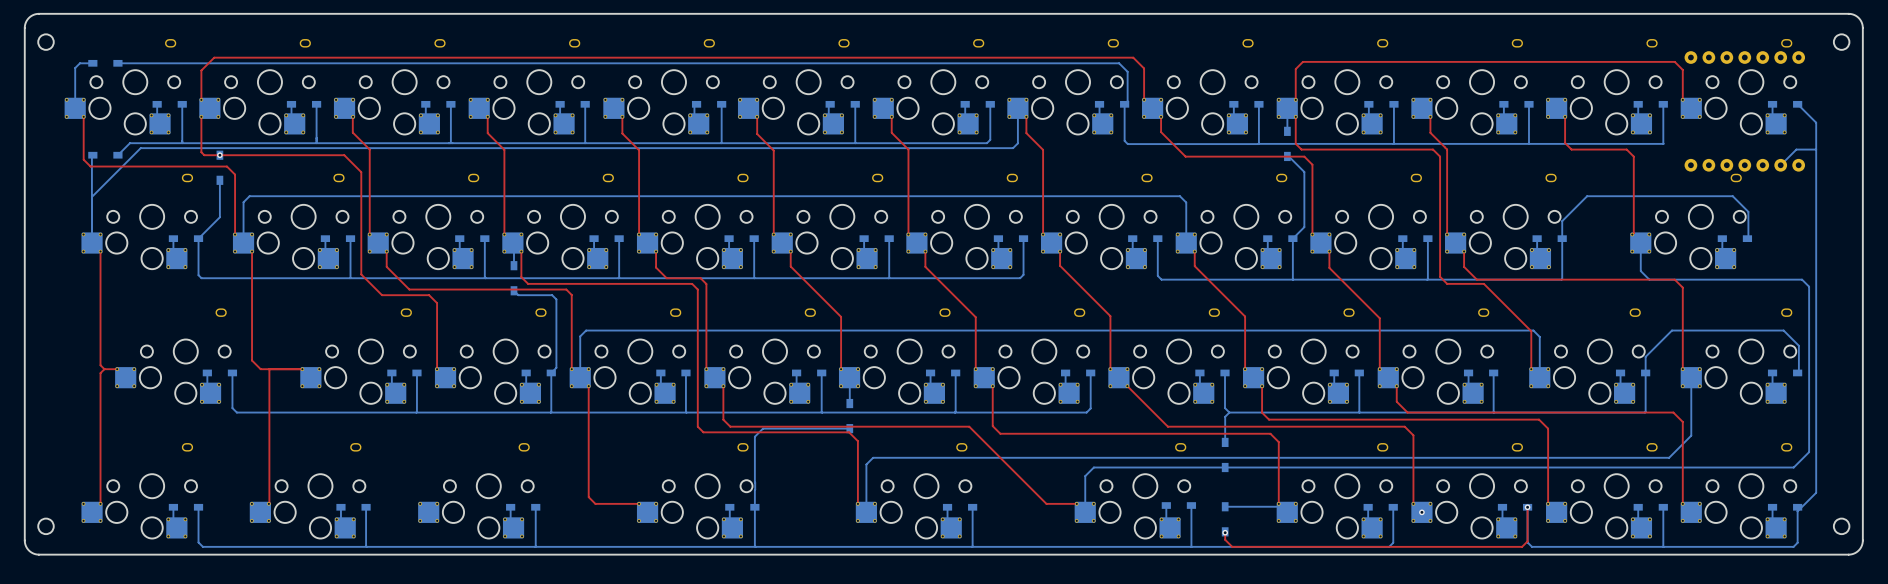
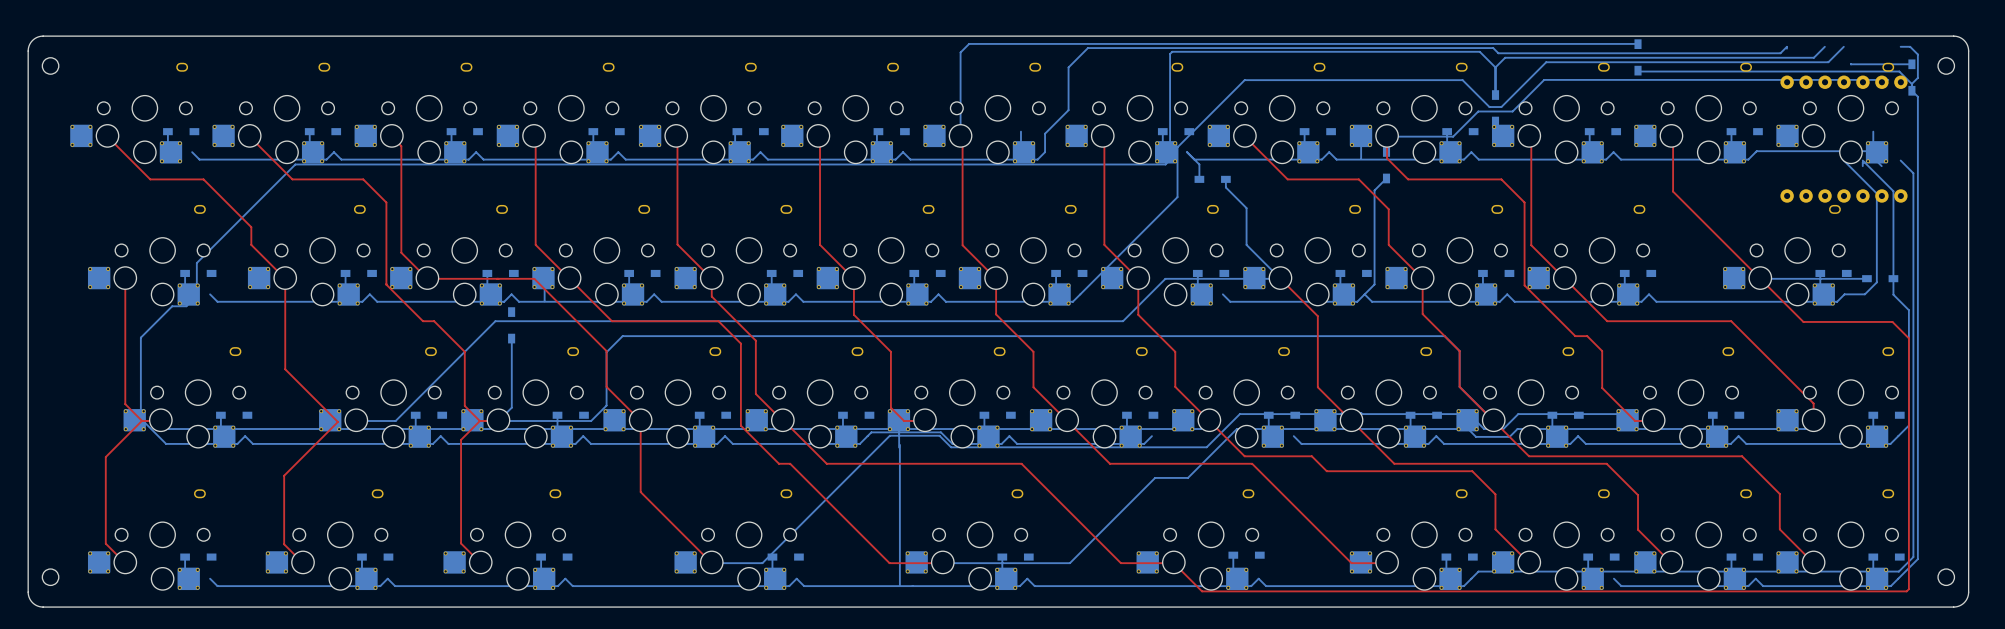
bottom track: none -> (1638, 44) (969, 43) (960, 52) (960, 136)
bottom track: none -> (1824, 46) (1813, 57) (1505, 57) (1495, 67) (1495, 95)
bottom track: none -> (1843, 46) (1828, 62) (1546, 62) (1501, 107) (1489, 107) (1462, 80) (1244, 80) (1177, 147) (1177, 197) (1072, 301) (945, 301) (938, 294) (931, 301) (803, 301) (795, 294) (788, 301) (661, 301) (654, 294) (646, 301) (519, 301) (511, 294) (504, 301) (377, 301) (369, 294) (362, 301) (217, 301) (210, 294)
bottom track: none -> (1900, 46) (1910, 46) (1917, 54) (1917, 77) (1911, 83) (1911, 90) (1917, 96) (1917, 559) (1890, 586) (1763, 586) (1755, 578) (1748, 586) (1621, 586) (1613, 578)
bottom track: none -> (1786, 48) (1786, 46) (1780, 53) (1498, 53) (1493, 48) (1087, 48) (1068, 67) (1068, 110) (1045, 133) (1045, 152) (1037, 159) (910, 159) (903, 152) (895, 159) (767, 159) (760, 152) (753, 159) (625, 159) (618, 152) (610, 159) (483, 159) (476, 152) (468, 159) (341, 159) (333, 152) (326, 159) (199, 159) (192, 152)
part: none -> (1638, 57)
bottom track: none -> (1850, 64) (1911, 64)
bottom track: none -> (1495, 67) (1479, 51) (1172, 51) (1170, 54) (1170, 160) (1165, 164) (295, 164) (196, 263) (196, 295) (186, 306) (172, 306) (140, 337) (140, 418) (166, 443) (237, 443) (245, 436) (252, 443) (432, 443) (440, 436) (448, 443) (575, 443) (583, 436) (591, 443) (717, 443) (725, 436) (732, 443) (859, 443) (871, 432) (940, 432) (952, 443) (1001, 443) (1009, 436) (1017, 443) (1144, 443) (1151, 436)
bottom track: none -> (1638, 70) (1899, 71) (1911, 84)
bottom track: none -> (1888, 79) (1544, 79) (1512, 111) (1478, 111) (1453, 136) (1387, 136) (1386, 151)
bottom track: (92, 63) (79, 63) (75, 68) (75, 108) -> none
part: (105, 63) -> none
bottom track: (117, 63) (1119, 63) (1127, 71) (1127, 101) (1124, 104) (1124, 140) (1127, 144) (1258, 143) -> none
part: none -> (1495, 108)
top track: (201, 99) (201, 70) (214, 57) (1133, 57) (1144, 68) (1144, 99) -> none
top track: (1295, 99) (1295, 69) (1302, 61) (1674, 61) (1682, 69) (1682, 99) -> none
bottom track: (182, 104) (182, 143) -> none
bottom track: (316, 104) (316, 143) -> none
bottom track: (450, 104) (450, 143) -> none
bottom track: (585, 104) (585, 143) -> none
bottom track: (721, 104) (721, 143) -> none
bottom track: (855, 104) (855, 143) -> none
part: (977, 104) -> none
bottom track: (990, 104) (990, 139) (986, 143) (129, 143) (117, 155) -> none
bottom track: (1258, 104) (1258, 143) -> none
bottom track: (1393, 104) (1393, 143) -> none
bottom track: (1528, 104) (1529, 143) -> none
bottom track: (1663, 104) (1663, 143) (1258, 143) -> none
part rotation: 0° (1785, 104) -> 90° clockwise (1911, 77)
part position: (1785, 104) -> (1911, 77)
bottom track: (1797, 104) (1816, 122) (1816, 492) (1797, 511) -> none
top track: none -> (107, 136) (150, 179) (203, 179) (251, 227) (251, 244) (285, 278) (285, 369) (337, 421) (284, 475) (284, 544) (303, 563)
top track: none -> (249, 136) (292, 179) (363, 179) (386, 202) (386, 284) (422, 321) (434, 321) (464, 351) (464, 405) (479, 420) (498, 420)
top track: none -> (391, 136) (401, 146) (401, 252) (427, 278) (534, 278) (606, 351) (606, 386) (640, 420) (640, 492) (711, 563)
top track: none -> (676, 136) (677, 244) (711, 278) (711, 296) (755, 340) (755, 393) (826, 463) (1021, 463) (1120, 563) (1173, 563) (1202, 591) (1906, 591) (1908, 589) (1908, 338) (1892, 321) (1803, 321) (1673, 191) (1673, 138) (1671, 136)
top track: none -> (818, 136) (820, 138) (820, 244) (853, 278) (853, 314) (890, 351) (890, 407) (904, 420) (925, 420)
top track: none -> (960, 136) (962, 138) (962, 245) (996, 278) (996, 314) (1033, 351) (1033, 387) (1109, 463) (1252, 463) (1351, 563) (1387, 563)
top track: none -> (1102, 136) (1104, 138) (1104, 244) (1138, 278) (1138, 314) (1175, 351) (1175, 386) (1244, 456) (1311, 456) (1326, 471) (1472, 471) (1495, 494) (1495, 529) (1529, 563)
top track: none -> (1244, 136) (1287, 179) (1358, 179) (1388, 209) (1388, 244) (1422, 278) (1422, 314) (1459, 351) (1459, 386) (1529, 456) (1742, 456) (1779, 493) (1779, 529) (1813, 563)
top track: none -> (1529, 136) (1531, 138) (1531, 245) (1607, 321) (1731, 321) (1813, 403) (1813, 420)
top track: (83, 116) (83, 159) (90, 166) (226, 166) (235, 174) (235, 234) -> none
top track: (201, 116) (201, 152) (204, 155) (344, 155) (361, 172) (361, 274) (382, 295) (429, 295) (437, 303) (437, 369) -> none
top track: (353, 116) (352, 132) (369, 149) (369, 234) -> none
top track: (487, 116) (487, 133) (504, 149) (504, 234) -> none
top track: (757, 116) (757, 134) (773, 150) (773, 234) -> none
top track: (891, 116) (891, 132) (908, 149) (908, 234) -> none
bottom track: (1009, 116) (1017, 108) (1017, 143) (1013, 148) (140, 148) (92, 196) (92, 243) -> none
top track: (1026, 116) (1026, 133) (1043, 149) (1043, 234) -> none
top track: (1161, 116) (1161, 132) (1185, 156) (1304, 156) (1312, 164) (1312, 234) -> none
top track: (1295, 116) (1295, 143) (1301, 149) (1331, 149) -> (1387, 136) (1387, 158) (1408, 179)
top track: (1430, 116) (1430, 132) (1447, 149) (1447, 234) -> none
top track: (1565, 116) (1565, 143) (1571, 149) (1626, 149) (1633, 156) (1632, 234) -> none
top track: (622, 117) (622, 133) (639, 150) (639, 234) -> none
bottom track: none -> (1187, 152) (1199, 164) (1199, 179)
bottom track: none -> (1194, 159) (1321, 159) (1329, 152) (1336, 159) (1463, 159) (1471, 152) (1478, 159) (1606, 159) (1613, 152) (1620, 159) (1748, 159) (1756, 151) (1866, 151) (1881, 166)
bottom track: none -> (1843, 160) (1876, 193) (1876, 282) (1864, 294) (1844, 294) (1837, 301) (1656, 301) (1649, 294) (1641, 301) (1514, 301) (1507, 294) (1499, 301) (1372, 301) (1364, 294)
bottom track: none -> (1862, 160) (1893, 191) (1893, 294) (1908, 310) (1908, 425) (1890, 443) (1746, 443) (1738, 436) (1730, 443) (1585, 443) (1578, 436) (1570, 443) (1444, 443) (1436, 436) (1428, 443) (1301, 443) (1293, 436)
bottom track: none -> (1900, 160) (1913, 173) (1913, 557) (1898, 571) (1478, 571) (1463, 586) (1266, 586) (1258, 578) (1251, 586) (1034, 586) (1027, 578) (1019, 586) (804, 586) (796, 578) (789, 586) (572, 586) (565, 578) (557, 586) (395, 586) (387, 578) (380, 586) (217, 586) (210, 578)
bottom track: none -> (1864, 162) (1862, 162) (1862, 166)
part position: (1287, 143) -> (1386, 165)
bottom track: none -> (1386, 178) (1374, 190) (1374, 284) (1357, 301) (1230, 301) (1222, 294)
part: none -> (1212, 179)
bottom track: none -> (1225, 179) (1225, 187) (1246, 208) (1246, 244) (1280, 278) (1165, 278) (1123, 321) (495, 321) (395, 420) (356, 420)
top track: (1420, 149) (1433, 149) (1440, 156) (1440, 276) (1447, 283) (1483, 283) (1531, 331) (1531, 369) -> (1501, 179) (1524, 202) (1524, 285) (1575, 336) (1587, 336) (1602, 351) (1602, 388) (1635, 420) (1653, 420)
bottom track: (1816, 149) (1796, 149) (1780, 165) -> none
part: (105, 155) -> none
via: (219, 155) -> none
bottom track: (91, 156) (91, 242) -> none
bottom track: (1287, 156) (1304, 172) (1304, 227) (1292, 238) (1293, 279) -> none
part: (219, 167) -> none
bottom track: (219, 180) (219, 217) (198, 238) (198, 275) (201, 278) (1020, 278) (1023, 274) (1023, 238) -> none
bottom track: (350, 238) (350, 277) -> none
bottom track: (484, 238) (485, 278) -> none
bottom track: (619, 238) (618, 278) -> none
bottom track: (754, 238) (754, 278) -> none
bottom track: (889, 238) (888, 278) -> none
bottom track: (1157, 238) (1157, 275) (1161, 279) (1561, 279) (1562, 221) (1587, 196) (1732, 196) (1748, 211) (1747, 238) -> none
bottom track: (1427, 238) (1427, 279) -> none
top track: none -> (125, 278) (125, 404) (142, 420)
bottom track: (243, 243) (243, 202) (249, 196) (1179, 196) (1186, 202) (1186, 243) -> none
top track: none -> (1280, 278) (1317, 316) (1317, 387) (1394, 463) (1606, 463) (1638, 495) (1638, 529) (1671, 563)
bottom track: (1640, 243) (1640, 271) (1649, 279) (1802, 279) (1809, 286) (1809, 452) (1793, 467) (1093, 467) (1085, 476) (1085, 512) -> none
bottom track: none -> (1866, 278) (1760, 278)
part: none -> (1880, 278)
top track: (100, 251) (100, 365) (104, 369) -> none
top track: (252, 251) (252, 360) (260, 369) (302, 369) -> none
top track: (386, 251) (386, 266) (409, 289) (566, 289) (571, 294) (571, 369) -> none
top track: (521, 251) (521, 277) (528, 283) (577, 283) -> (534, 136) (535, 138) (535, 244) (611, 321)
top track: (656, 251) (656, 267) (666, 278) (700, 278) (706, 284) (706, 369) -> none
top track: (790, 251) (790, 266) (841, 316) (841, 369) -> none
top track: (925, 251) (925, 266) (975, 317) (975, 369) -> none
top track: (1060, 251) (1060, 265) (1110, 316) (1110, 369) -> none
top track: (1194, 251) (1194, 266) (1245, 316) (1245, 369) -> none
top track: (1329, 251) (1329, 267) (1379, 318) (1379, 369) -> none
top track: (1464, 251) (1464, 266) (1476, 279) (1674, 279) (1682, 287) (1682, 369) -> none
part position: (513, 278) -> (511, 325)
top track: (678, 283) (692, 283) (697, 289) (697, 426) (703, 432) (849, 432) (857, 441) (857, 503) -> (718, 321) (740, 343) (740, 425) (778, 463) (790, 463) (889, 563) (942, 563)
bottom track: (513, 290) (518, 295) (552, 295) (556, 299) (556, 367) (551, 372) (550, 412) -> none
bottom track: none -> (511, 338) (511, 407) (498, 420) (591, 420) (606, 405) (606, 352) (622, 336) (1444, 336) (1459, 351) (1459, 386) (1493, 420)
top track: (116, 368) (104, 369) -> none
top track: (104, 369) (100, 373) (101, 503) -> none
top track: (269, 369) (268, 503) -> none
bottom track: (232, 372) (232, 408) (236, 412) (1086, 412) (1090, 408) (1090, 372) -> none
bottom track: (416, 372) (416, 412) -> none
bottom track: (685, 372) (686, 412) -> none
bottom track: (821, 372) (822, 412) -> none
bottom track: (955, 372) (955, 412) -> none
bottom track: (1225, 372) (1225, 408) (1229, 412) -> none
bottom track: (1359, 372) (1359, 412) -> none
bottom track: (1493, 372) (1493, 412) -> none
bottom track: (1797, 372) (1798, 345) (1783, 330) (1671, 330) (1645, 356) (1645, 412) (1229, 412) -> none
bottom track: (580, 377) (580, 336) (586, 330) (1533, 330) (1539, 336) (1539, 377) -> none
bottom track: (1691, 377) (1691, 435) (1669, 457) (873, 457) (866, 464) (866, 512) -> none
bottom track: none -> (160, 420) (168, 429) (1201, 429) (1209, 420)
top track: none -> (160, 420) (141, 420) (105, 457) (105, 543) (125, 563)
top track: none -> (479, 421) (461, 439) (461, 543) (480, 563)
bottom track: none -> (1653, 420) (1634, 420) (1627, 414) (1518, 414) (1503, 429) (1484, 429) (1469, 414) (1239, 414) (1206, 447) (951, 447) (939, 435) (889, 435) (762, 563) (711, 563)
bottom track: none -> (1813, 420) (1805, 429) (1517, 429) (1509, 436) (1476, 436) (1468, 429) (1236, 429) (1187, 477) (1155, 477) (1069, 563) (942, 563)
top track: (588, 386) (588, 497) (595, 503) (639, 503) -> none
top track: (723, 386) (723, 419) (730, 426) (969, 426) (1046, 503) (1076, 503) -> none
top track: (992, 386) (992, 426) (1000, 433) (1270, 433) (1278, 442) (1278, 503) -> none
top track: (1127, 386) (1167, 426) (1404, 426) (1413, 435) (1413, 503) -> none
top track: (1262, 386) (1262, 412) (1269, 419) (1539, 419) (1548, 428) (1548, 503) -> none
top track: (1396, 386) (1396, 401) (1407, 412) (1673, 412) (1682, 421) (1682, 503) -> none
bottom track: none -> (899, 444) (899, 585)
bottom track: (1229, 412) (1225, 416) (1225, 442) -> none
part: (849, 416) -> none
bottom track: (849, 428) (763, 428) (754, 436) (755, 546) -> none
part: (1225, 454) -> none
bottom track: (1191, 505) (1191, 546) -> none
bottom track: (1225, 506) (1281, 506) (1287, 512) -> none
bottom track: (198, 507) (198, 542) (202, 546) (1389, 546) (1393, 542) (1393, 507) -> none
bottom track: (366, 507) (366, 546) -> none
bottom track: (535, 507) (535, 546) -> none
bottom track: (972, 507) (972, 546) -> none
bottom track: (1527, 507) (1527, 542) (1532, 546) (1793, 546) (1797, 542) (1797, 507) -> none
top track: (1527, 507) (1527, 541) (1522, 546) (1232, 546) (1225, 539) (1225, 532) -> none
via: (1527, 507) -> none
bottom track: (1663, 507) (1663, 546) -> none
via: (1421, 512) -> none
part: (1225, 519) -> none
via: (1225, 532) -> none

